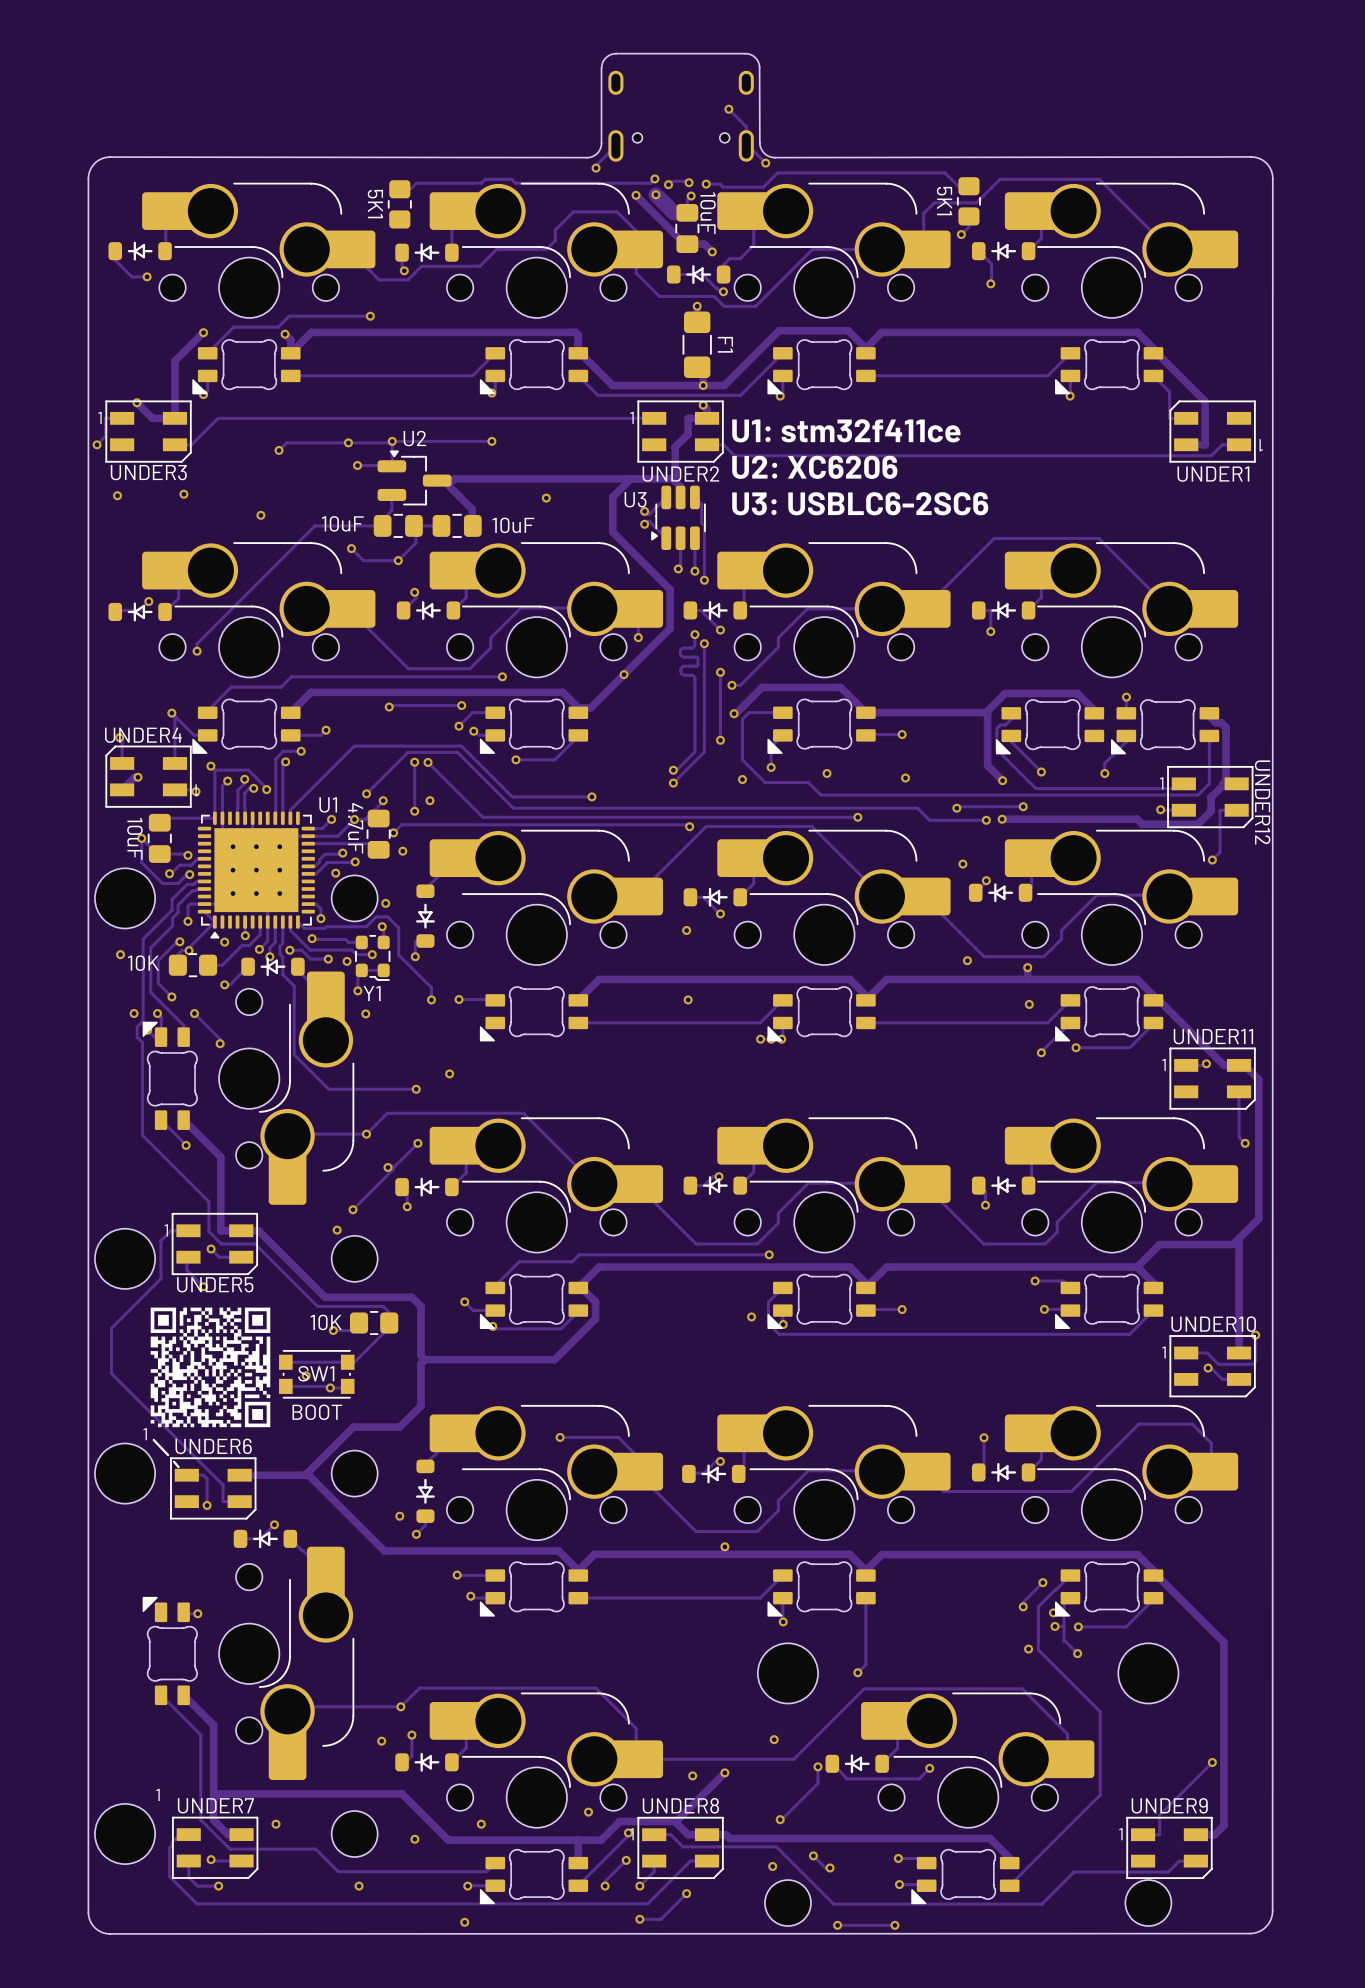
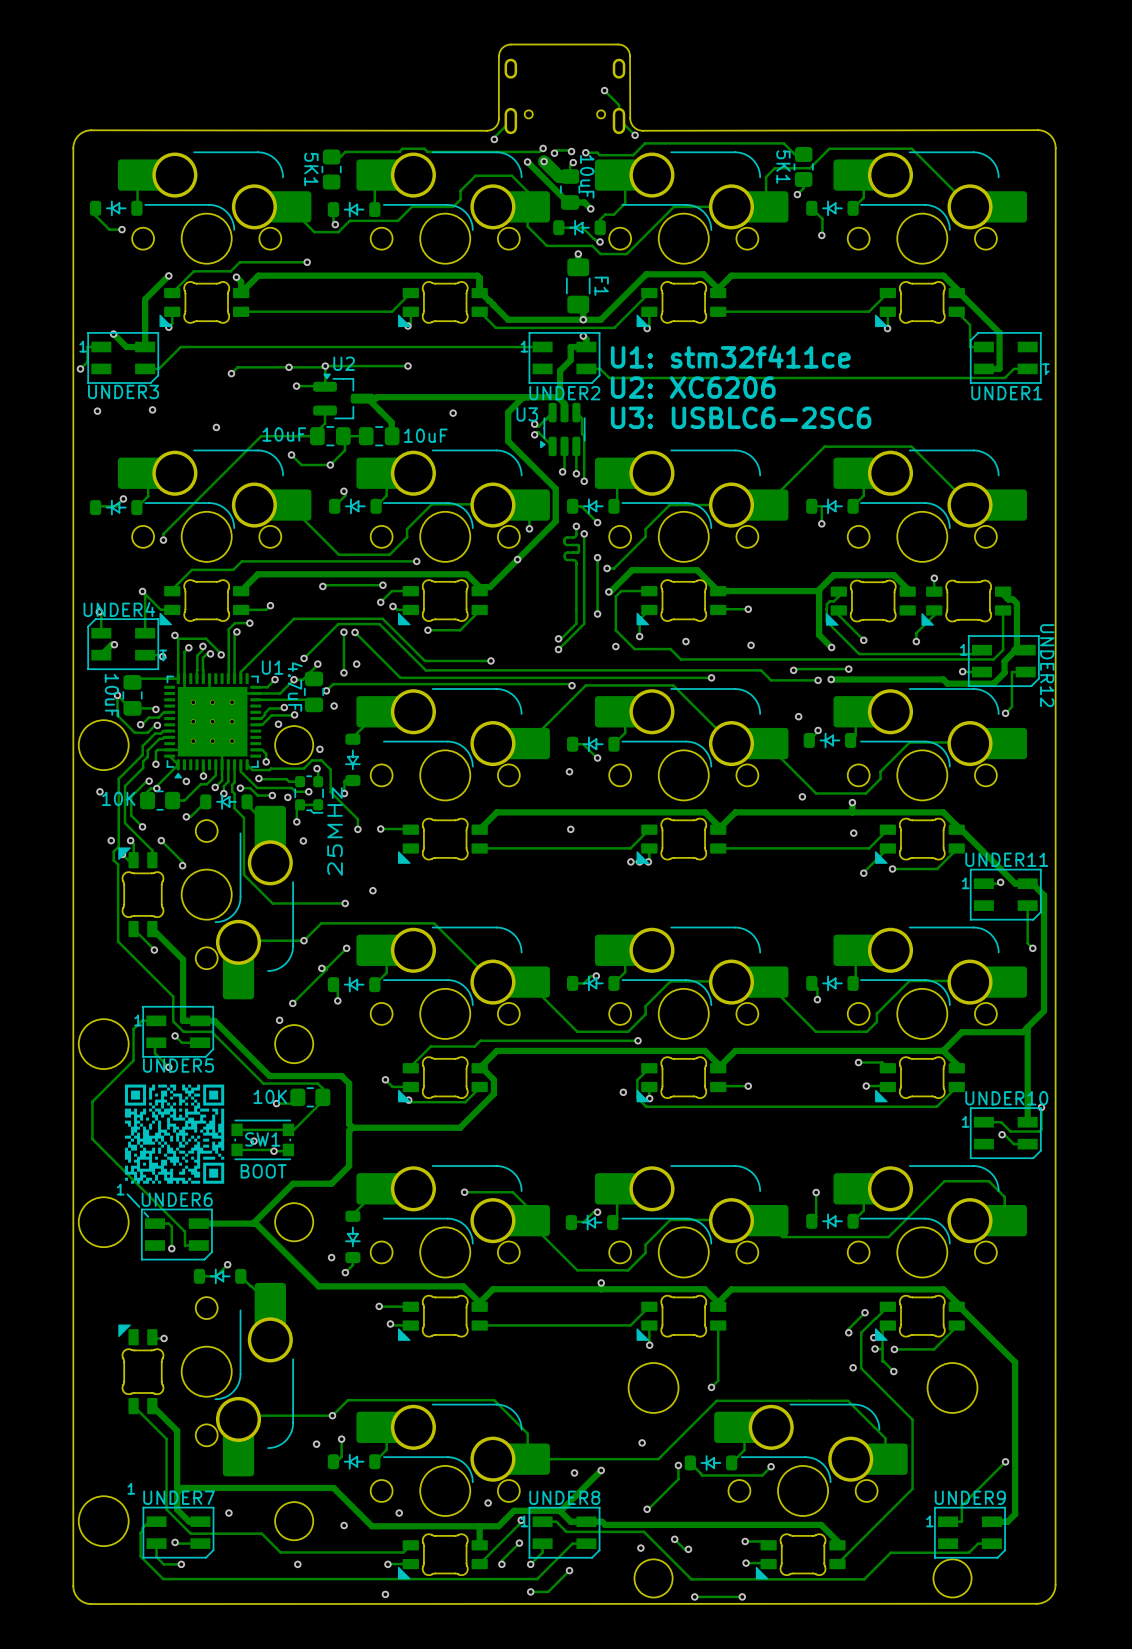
Y1 name: Y1 (372, 993) -> none
text: none -> 25MHz (335, 831)

